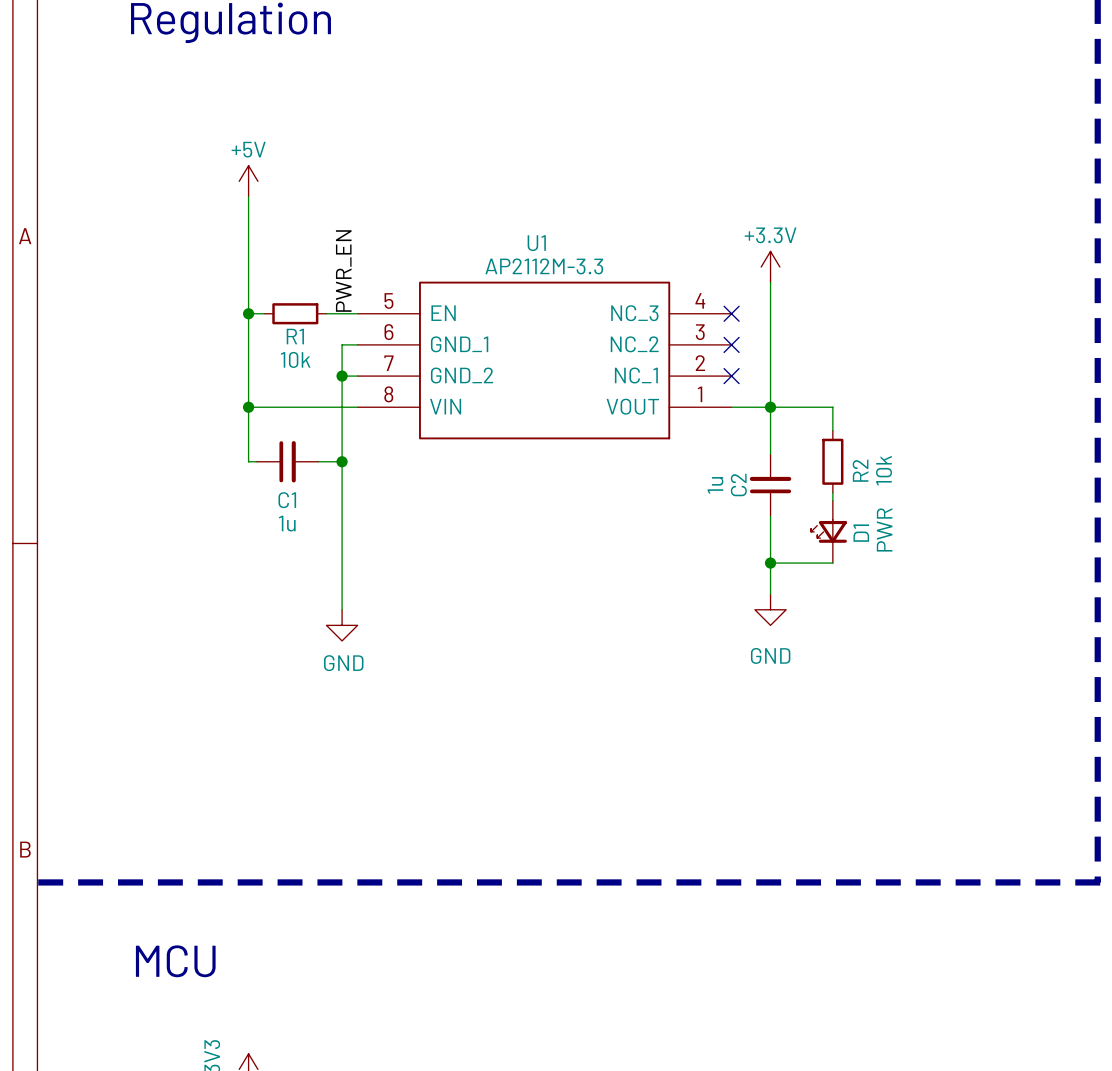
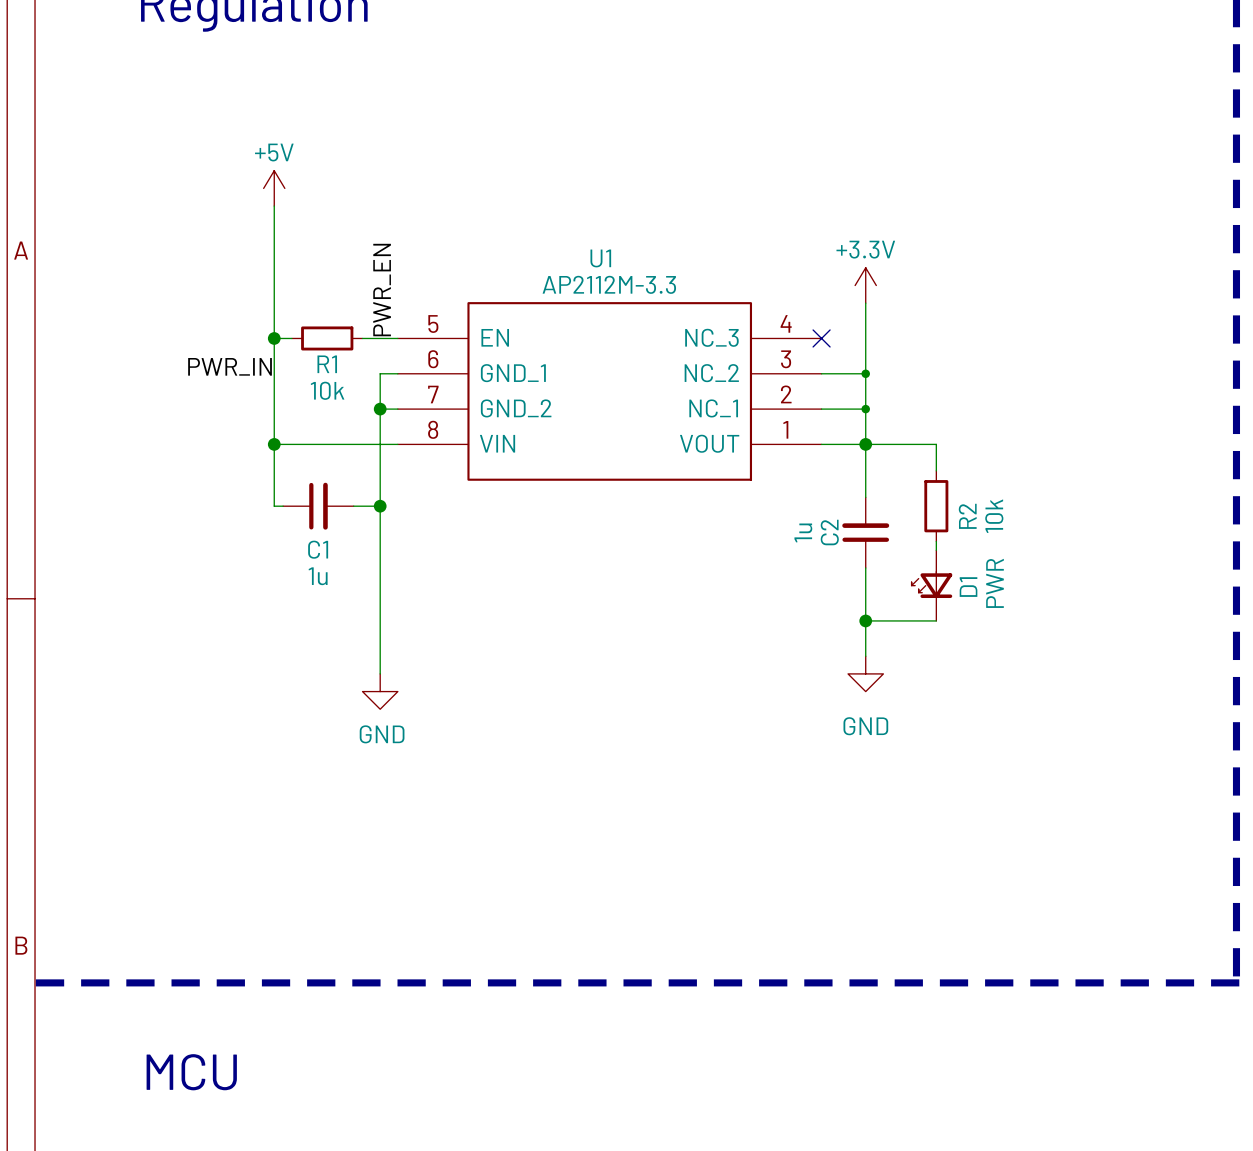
label: none -> PWR_IN (230, 366)
wire: none -> (821, 373) (865, 373)
no-connect mark: (731, 344) -> none
junction: none -> (865, 373)
wire: none -> (821, 409) (865, 409)
no-connect mark: (731, 376) -> none
junction: none -> (865, 409)

